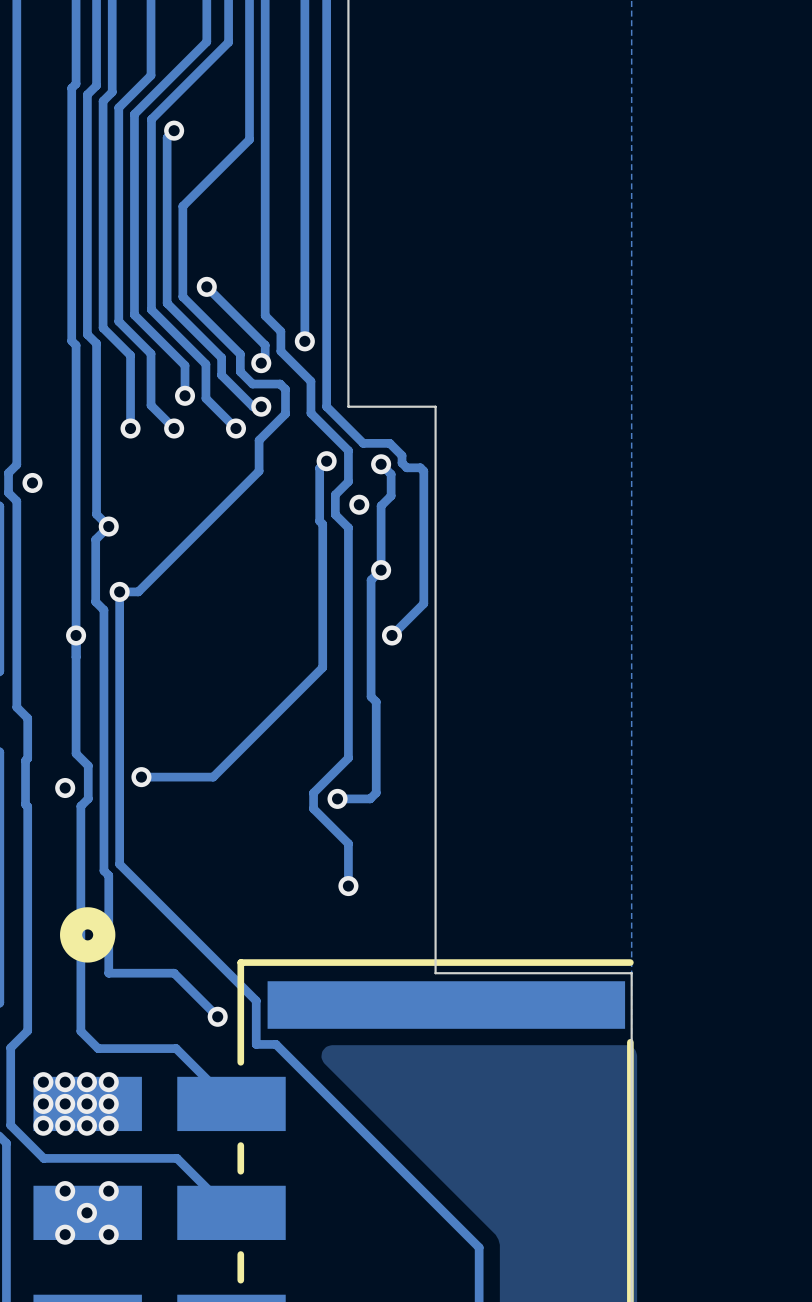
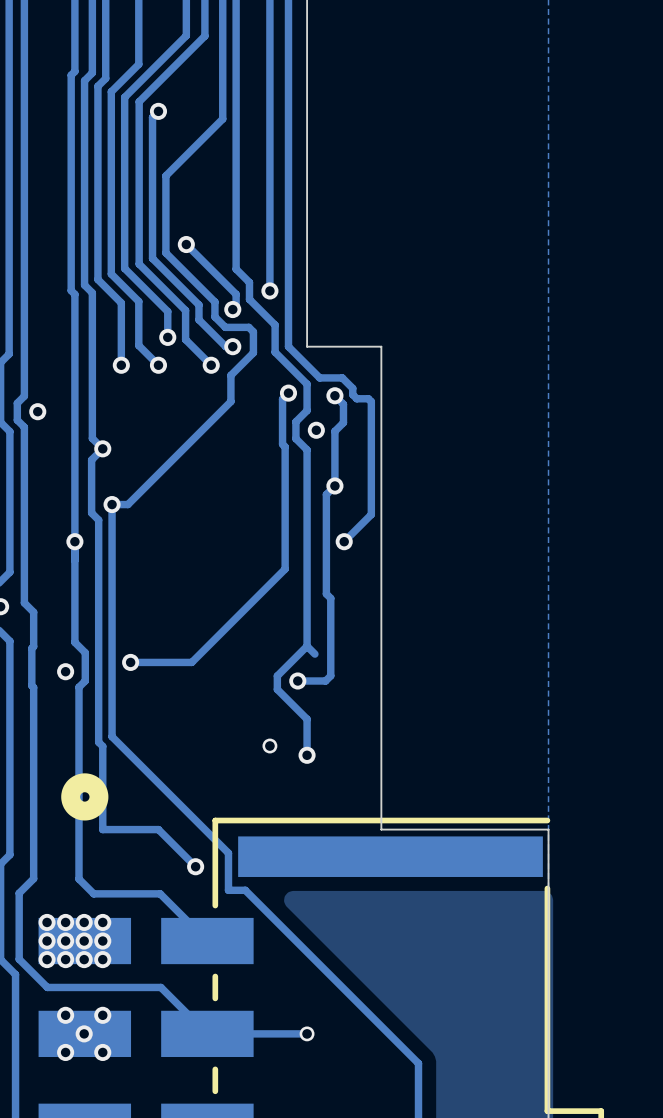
track: none -> (307, 646) (314, 654)
via: none -> (269, 746)
track: none -> (307, 1033) (207, 1033)
via: none -> (307, 1033)

